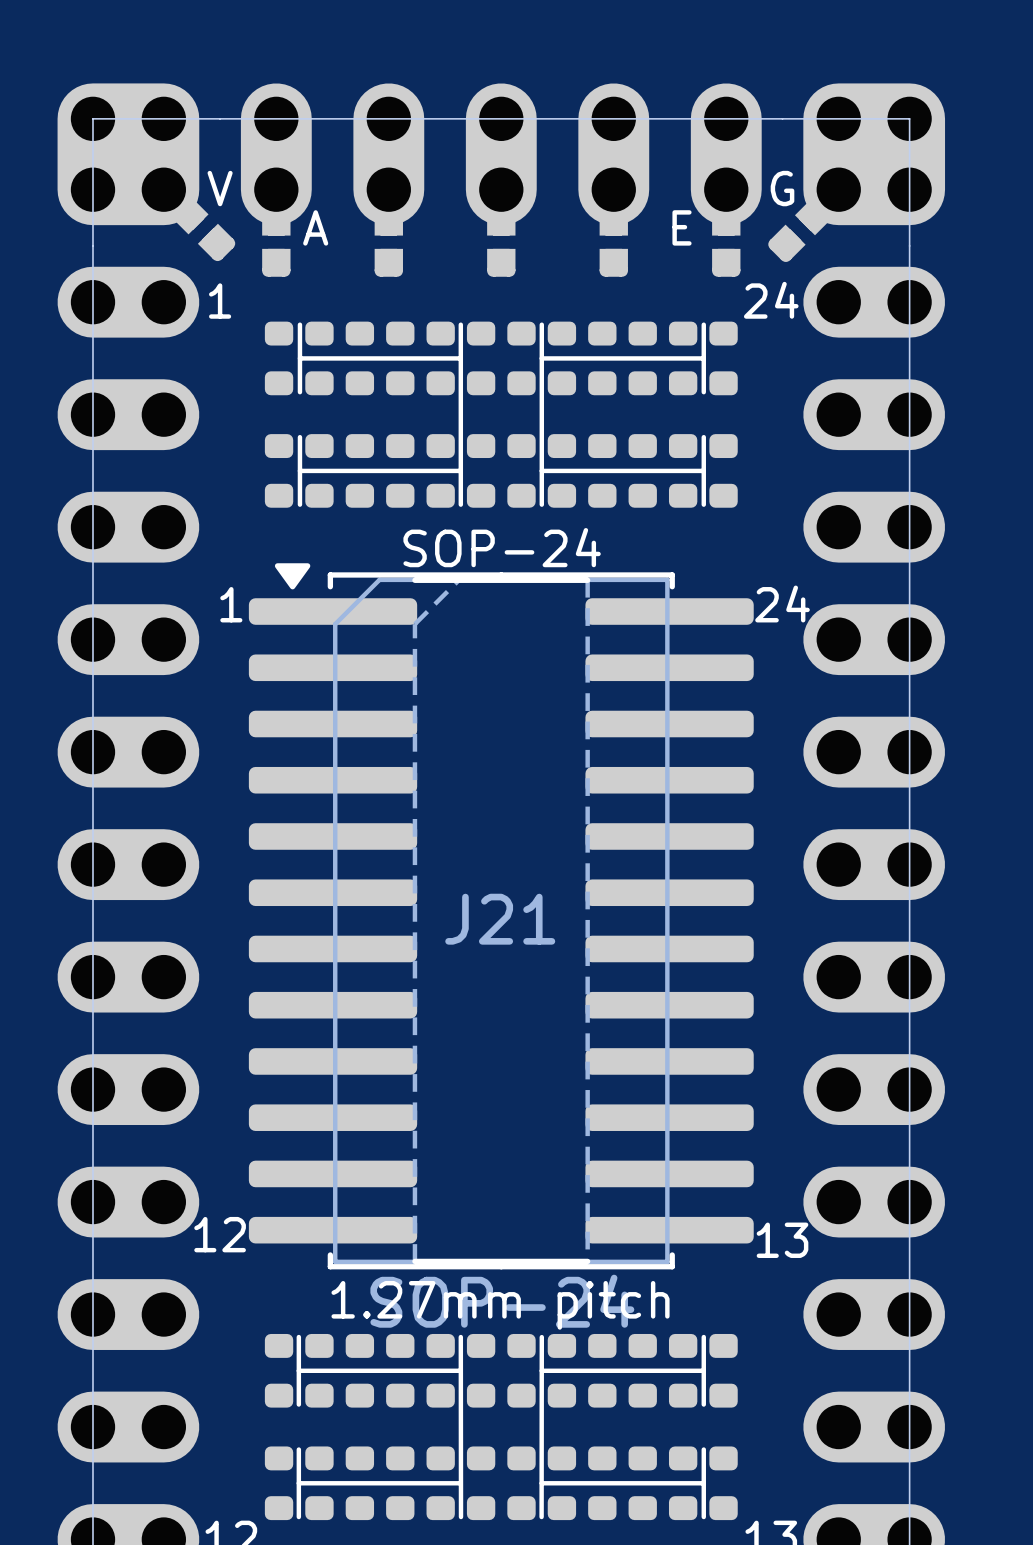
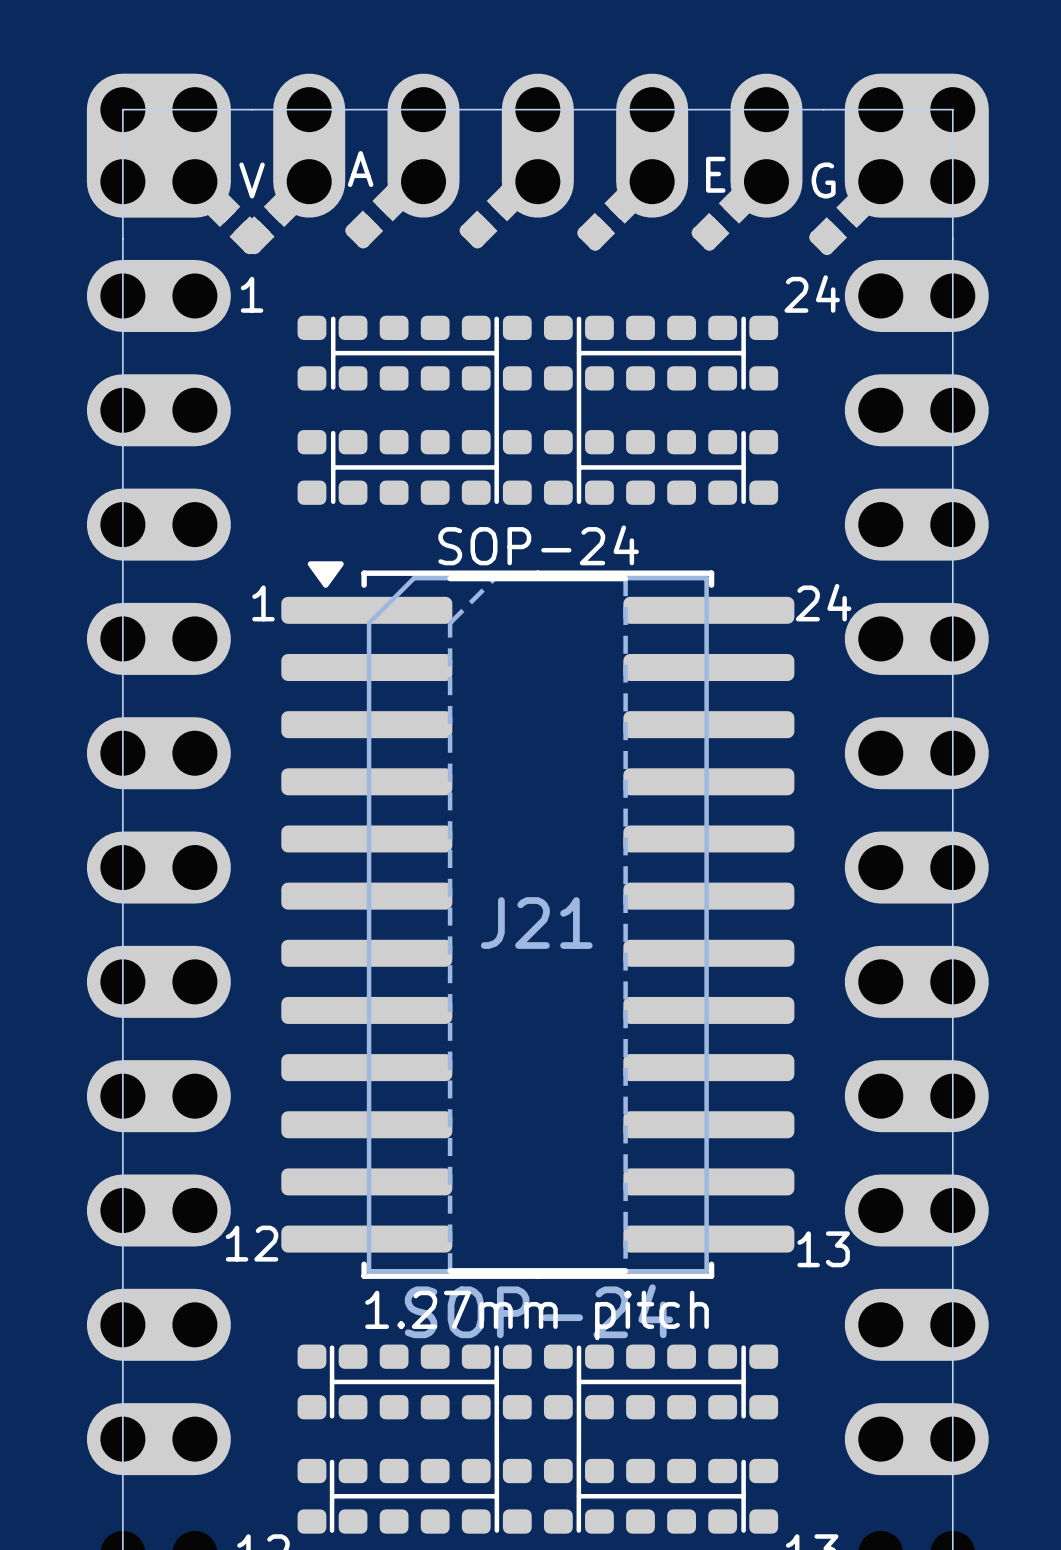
part: none -> (377, 215)
part: none -> (492, 215)
part: none -> (609, 218)
part: none -> (724, 218)
text position: A (315, 227) -> A (360, 169)
text position: E (682, 227) -> E (715, 174)
part: none -> (269, 221)
part: (276, 242) -> none
part: (388, 242) -> none
part: (501, 242) -> none
part: (613, 242) -> none
part: (726, 242) -> none

